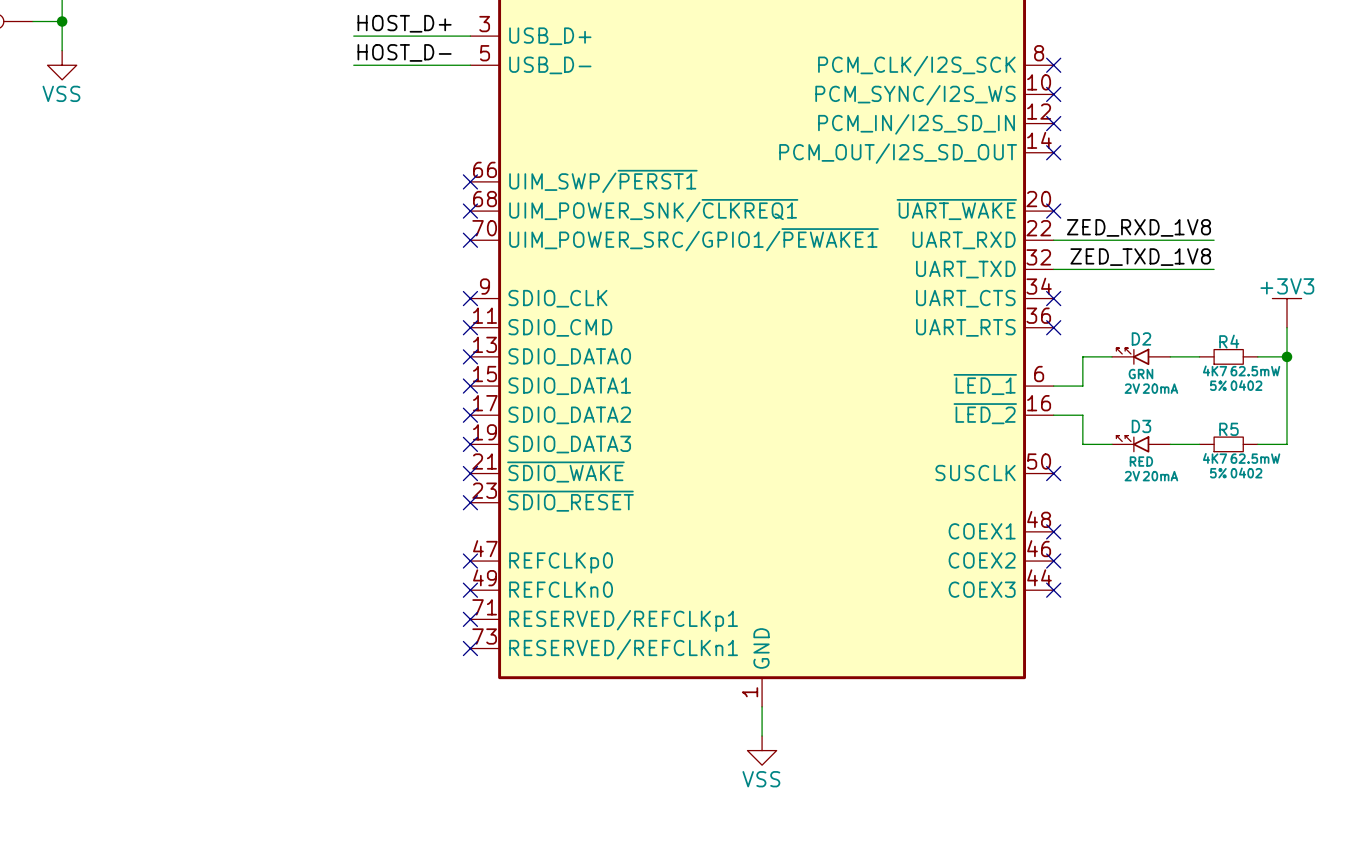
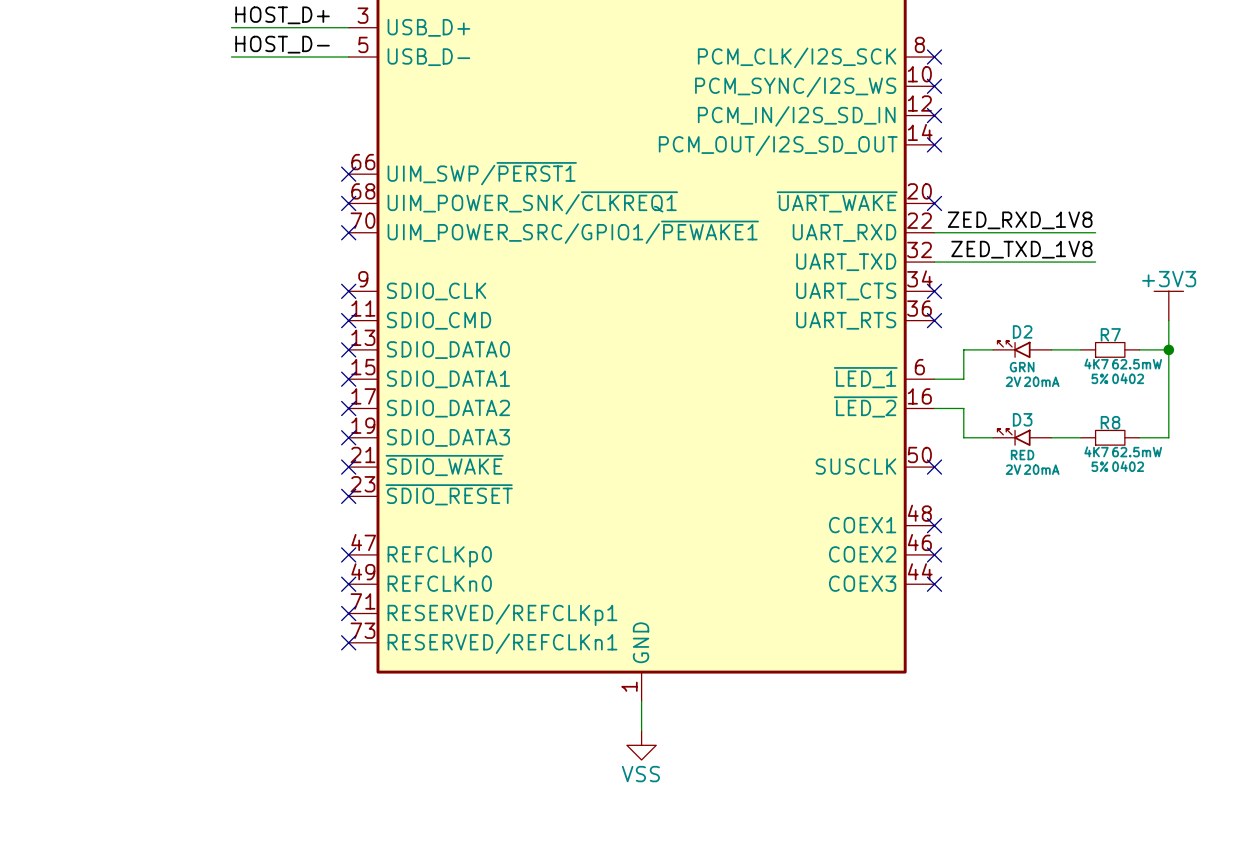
R4 name: R4 (1229, 341) -> R7 (1110, 334)
R5 name: R5 (1228, 429) -> R8 (1110, 422)

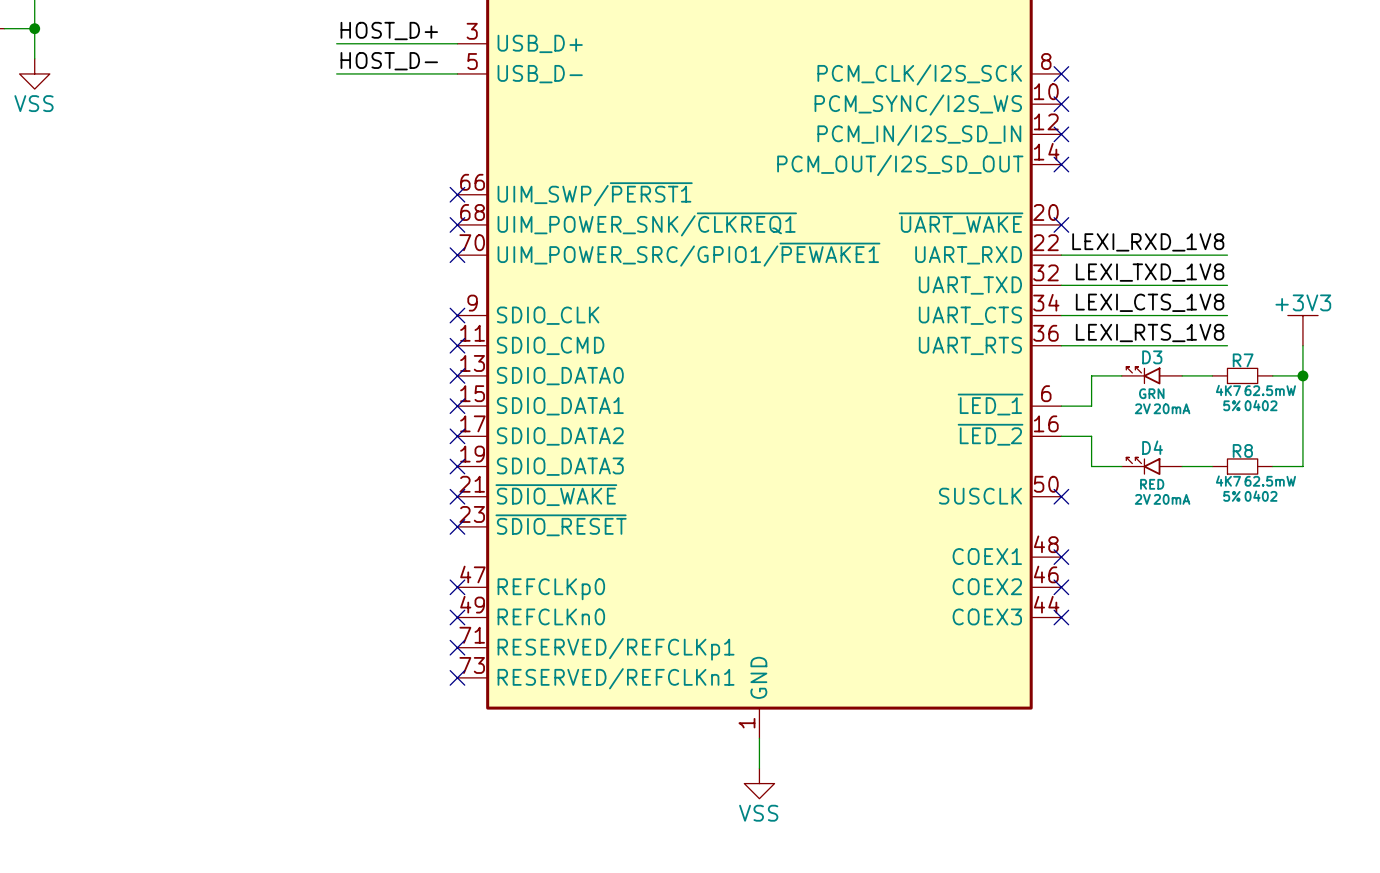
label: ZED_RXD_1V8 (1020, 220) -> LEXI_RXD_1V8 (1148, 242)
label: ZED_TXD_1V8 (1021, 249) -> LEXI_TXD_1V8 (1150, 272)
label: none -> LEXI_CTS_1V8 (1150, 302)
wire: none -> (1061, 315) (1227, 315)
no-connect mark: (934, 291) -> none
label: none -> LEXI_RTS_1V8 (1150, 332)
wire: none -> (1061, 345) (1227, 345)
no-connect mark: (934, 320) -> none
D2 name: D2 (1022, 331) -> D3 (1152, 357)
D3 name: D3 (1022, 419) -> D4 (1152, 447)

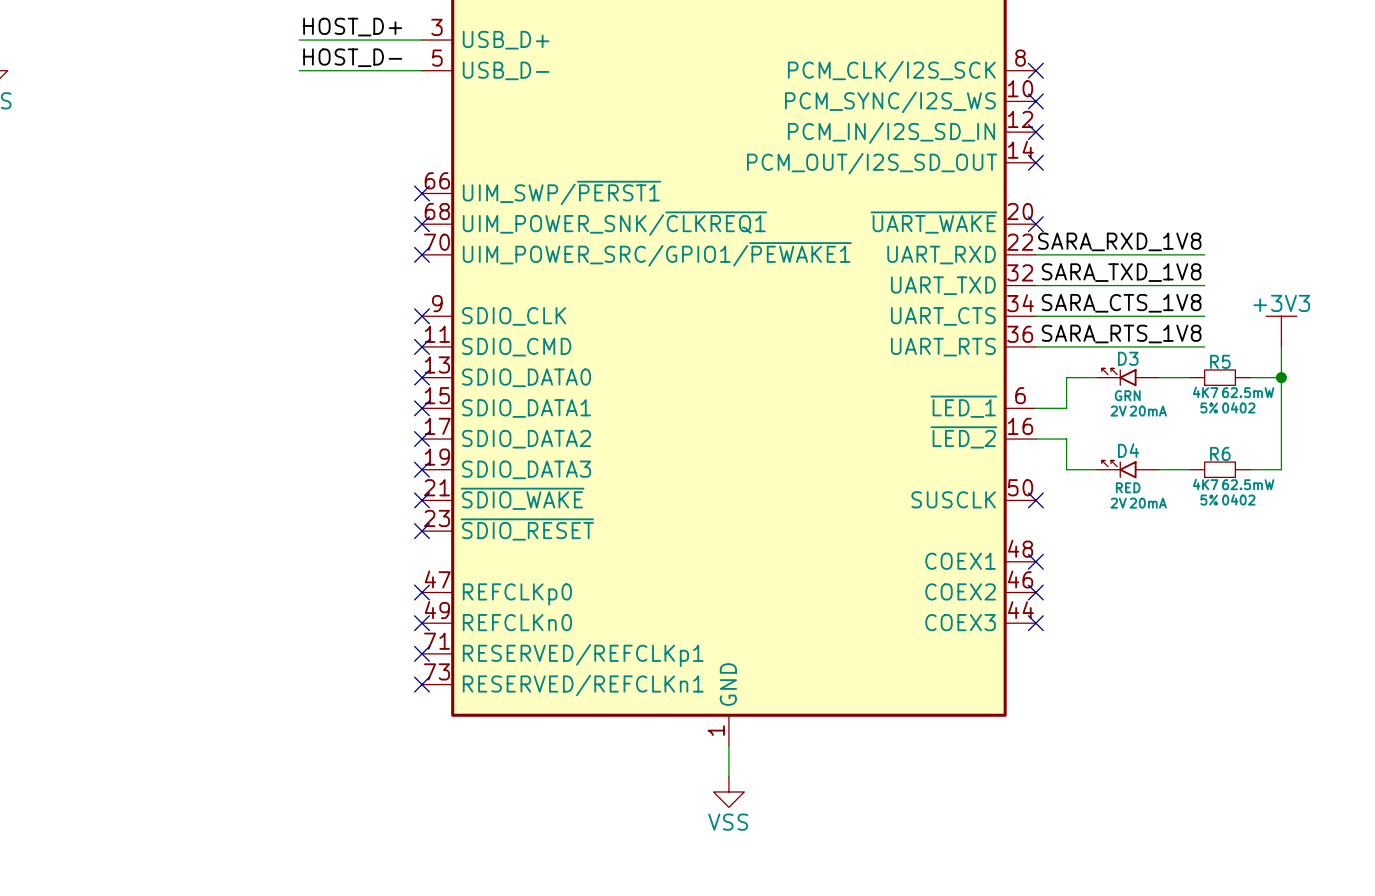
label: LEXI_RXD_1V8 (1148, 242) -> SARA_RXD_1V8 (1119, 241)
label: LEXI_TXD_1V8 (1150, 272) -> SARA_TXD_1V8 (1121, 272)
label: LEXI_CTS_1V8 (1150, 302) -> SARA_CTS_1V8 (1121, 303)
label: LEXI_RTS_1V8 (1150, 332) -> SARA_RTS_1V8 (1121, 333)
R7 name: R7 (1243, 360) -> R5 (1220, 361)
R8 name: R8 (1242, 450) -> R6 (1220, 453)

